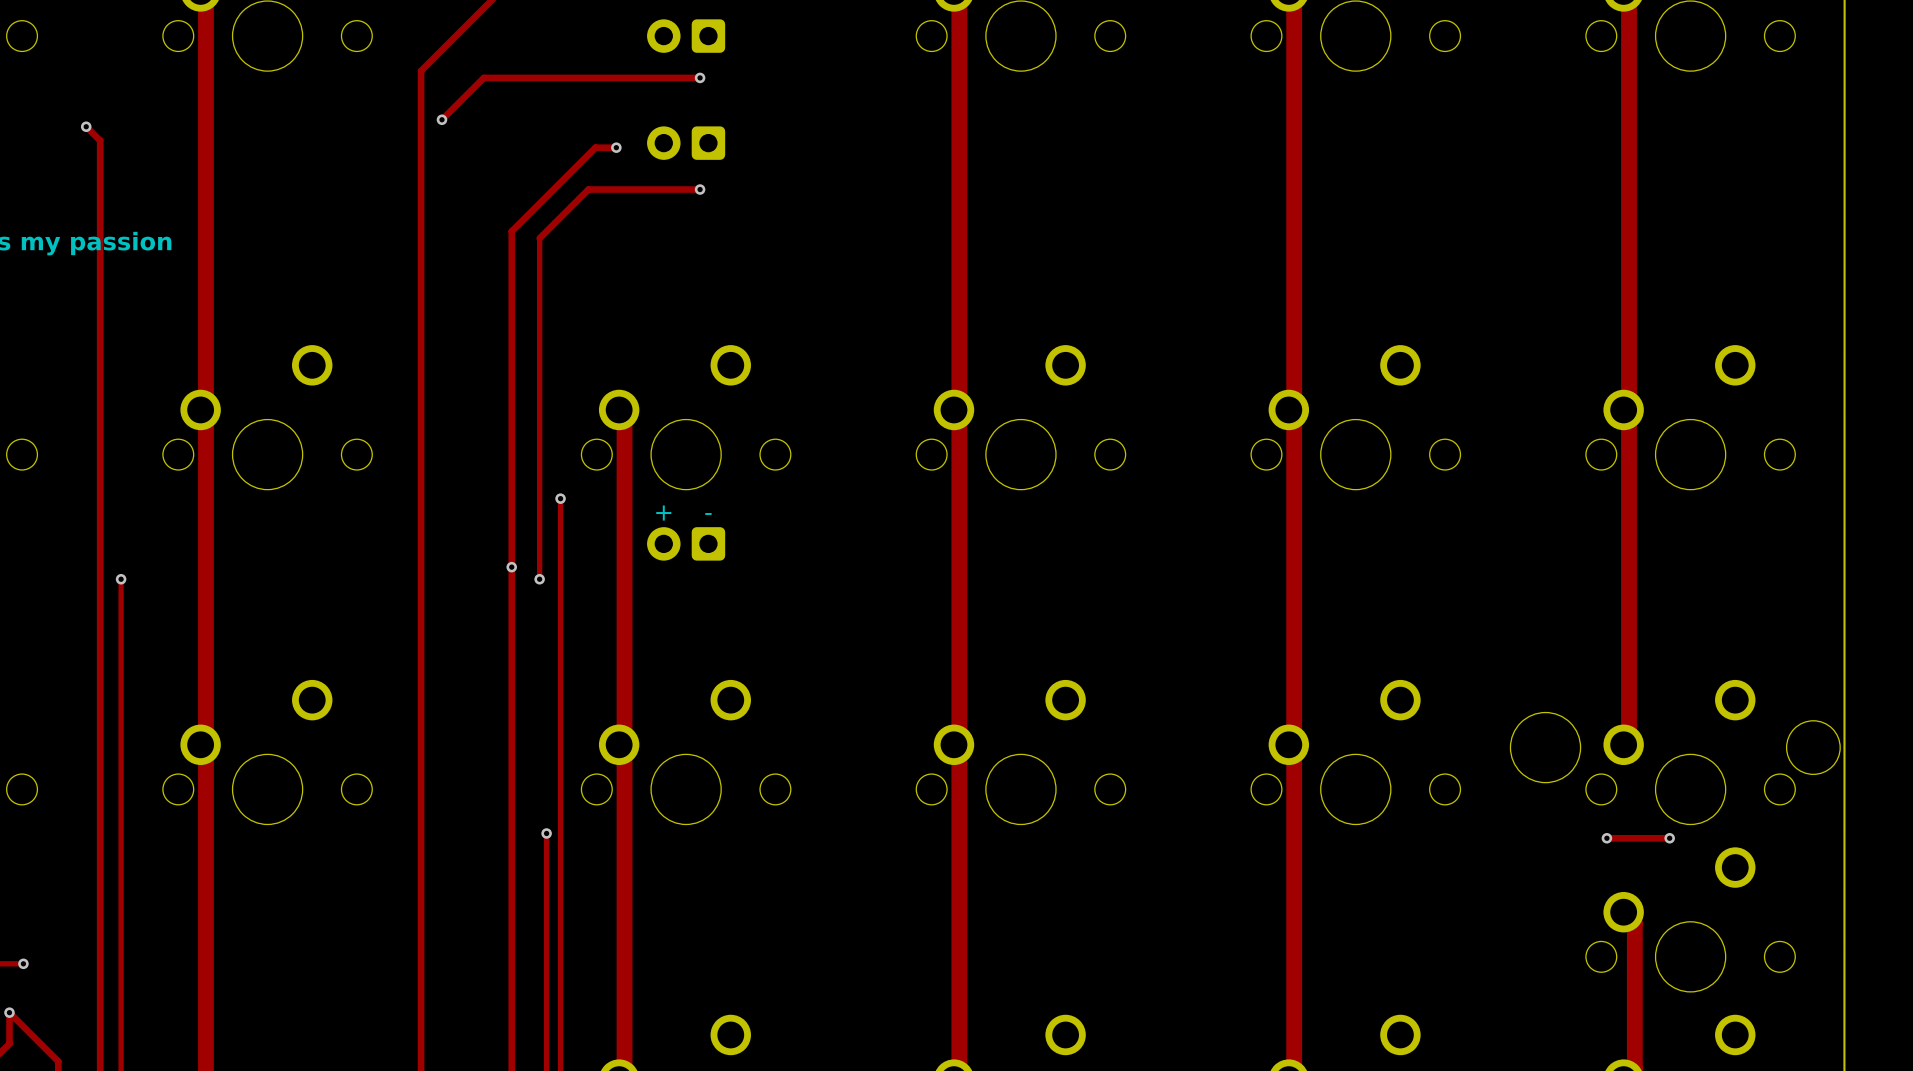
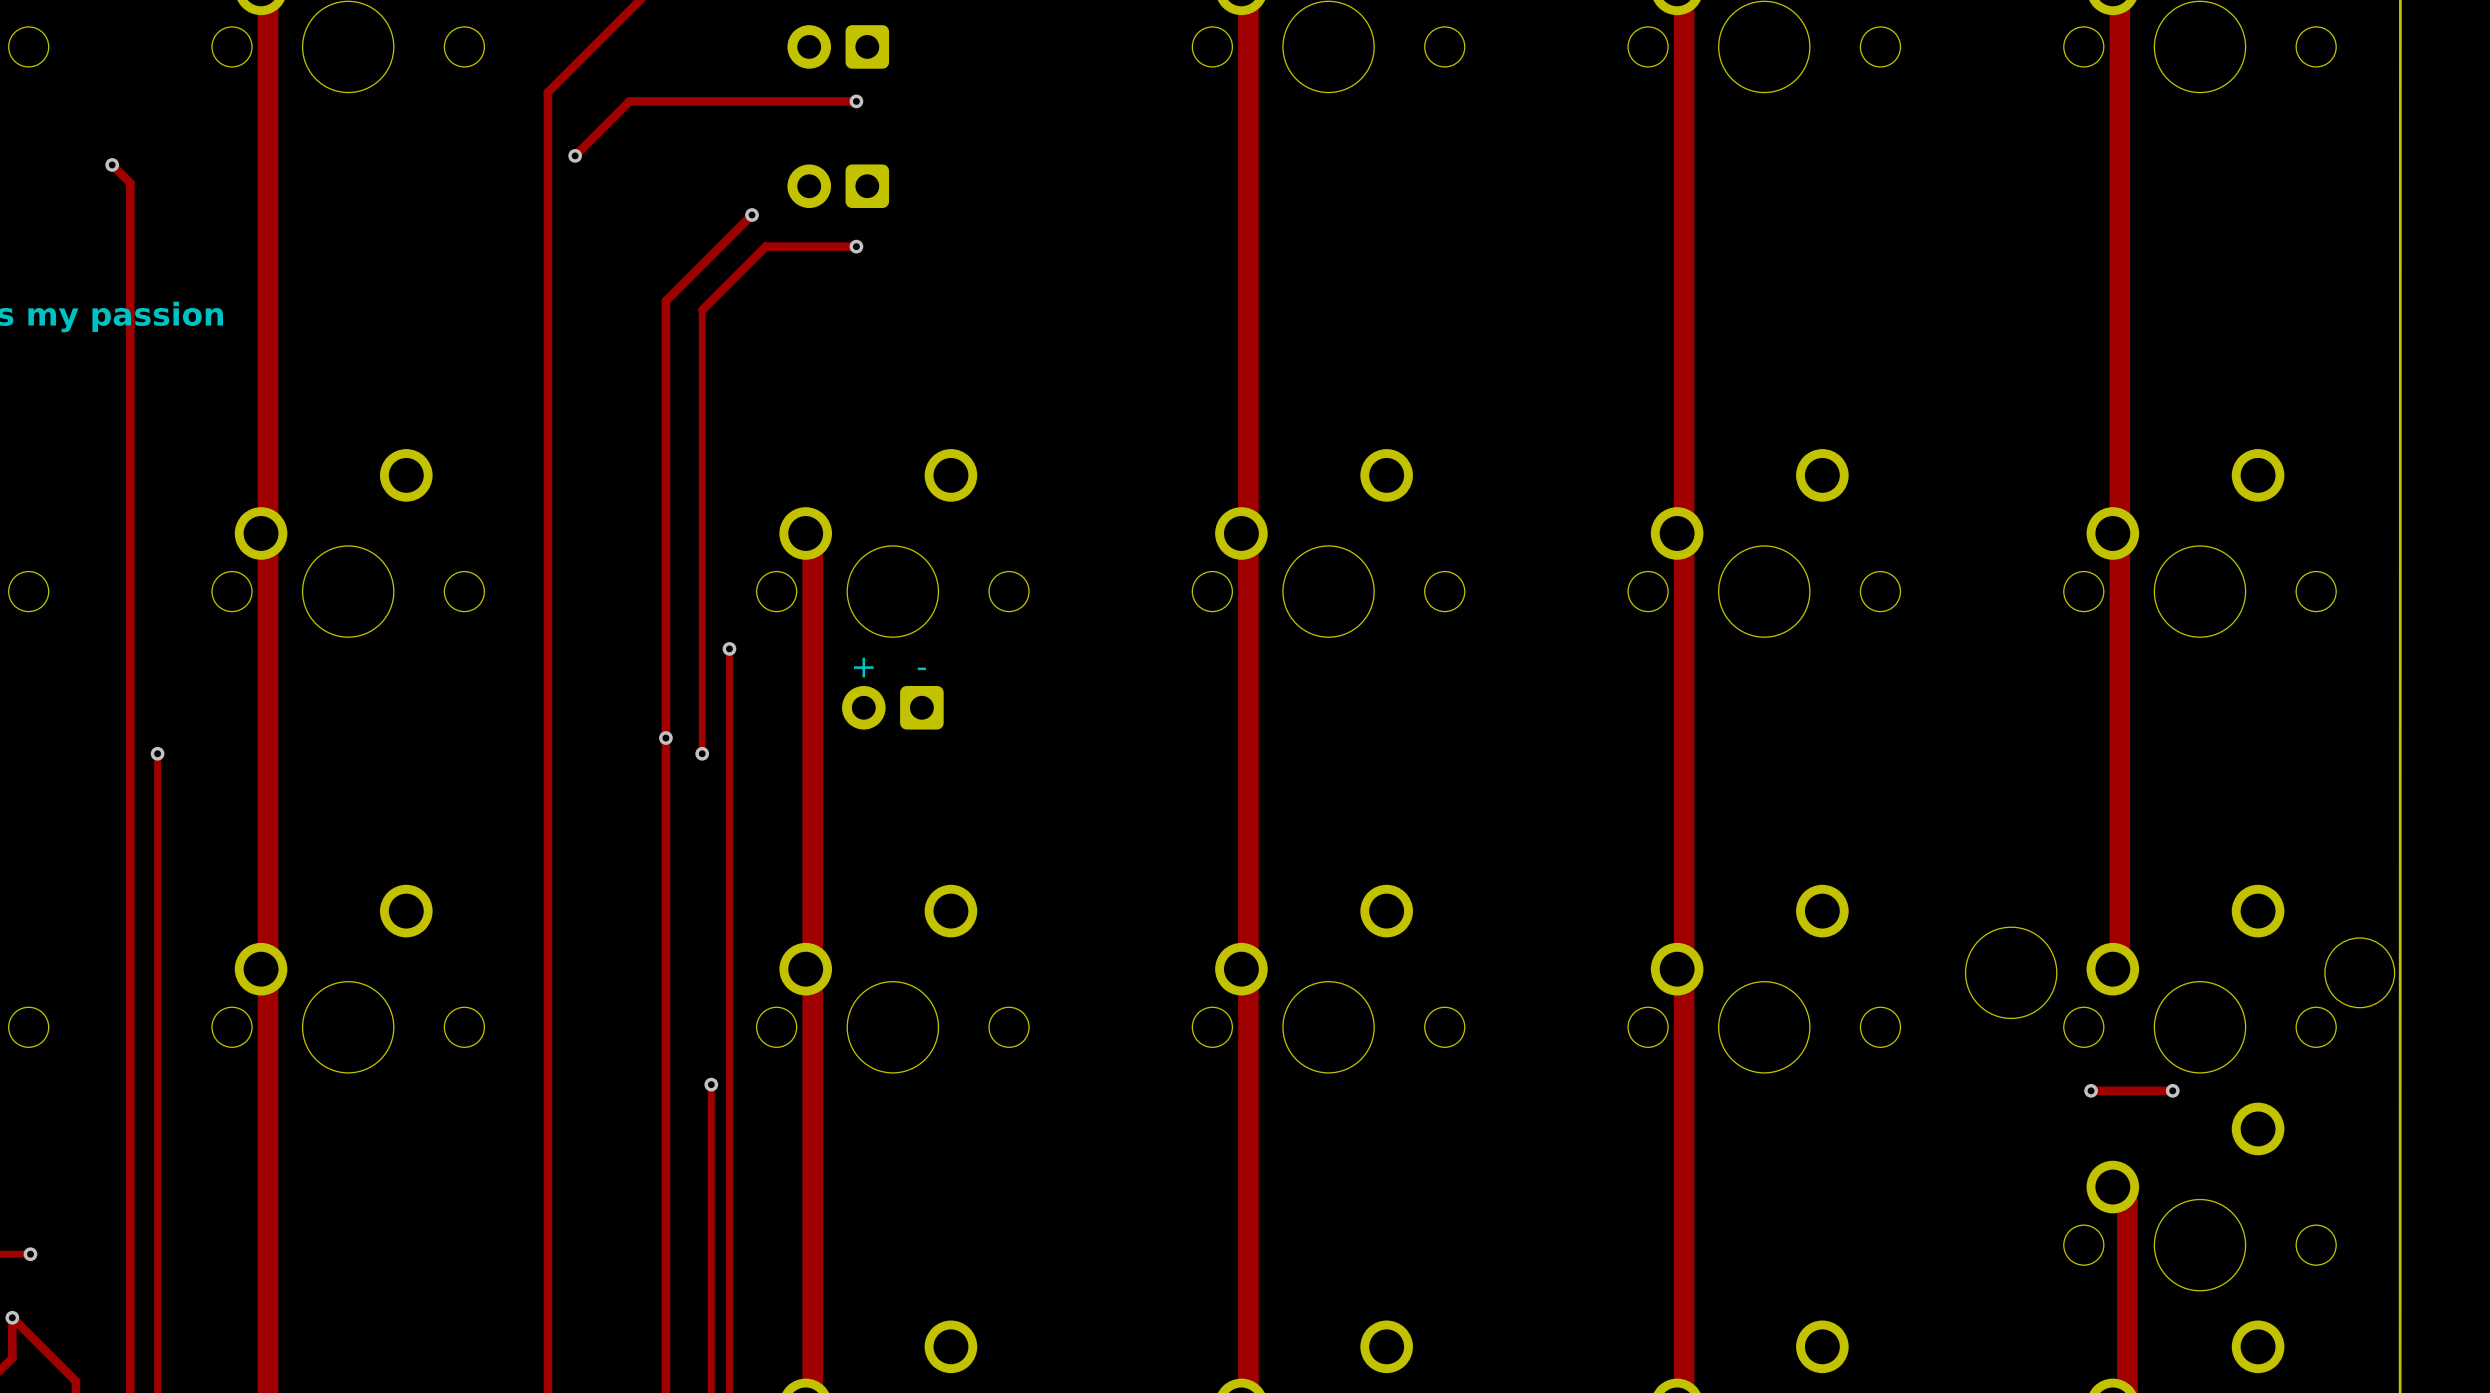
part position: (686, 36) -> (838, 46)
track: (658, 77) (700, 77) -> none
via: none -> (856, 101)
via: (700, 77) -> none
part position: (686, 143) -> (838, 186)
track: (616, 147) (595, 147) (577, 165) -> none
via: (616, 147) -> none
via: none -> (752, 214)
track: (658, 189) (700, 189) -> none
via: none -> (856, 246)
via: (700, 189) -> none

